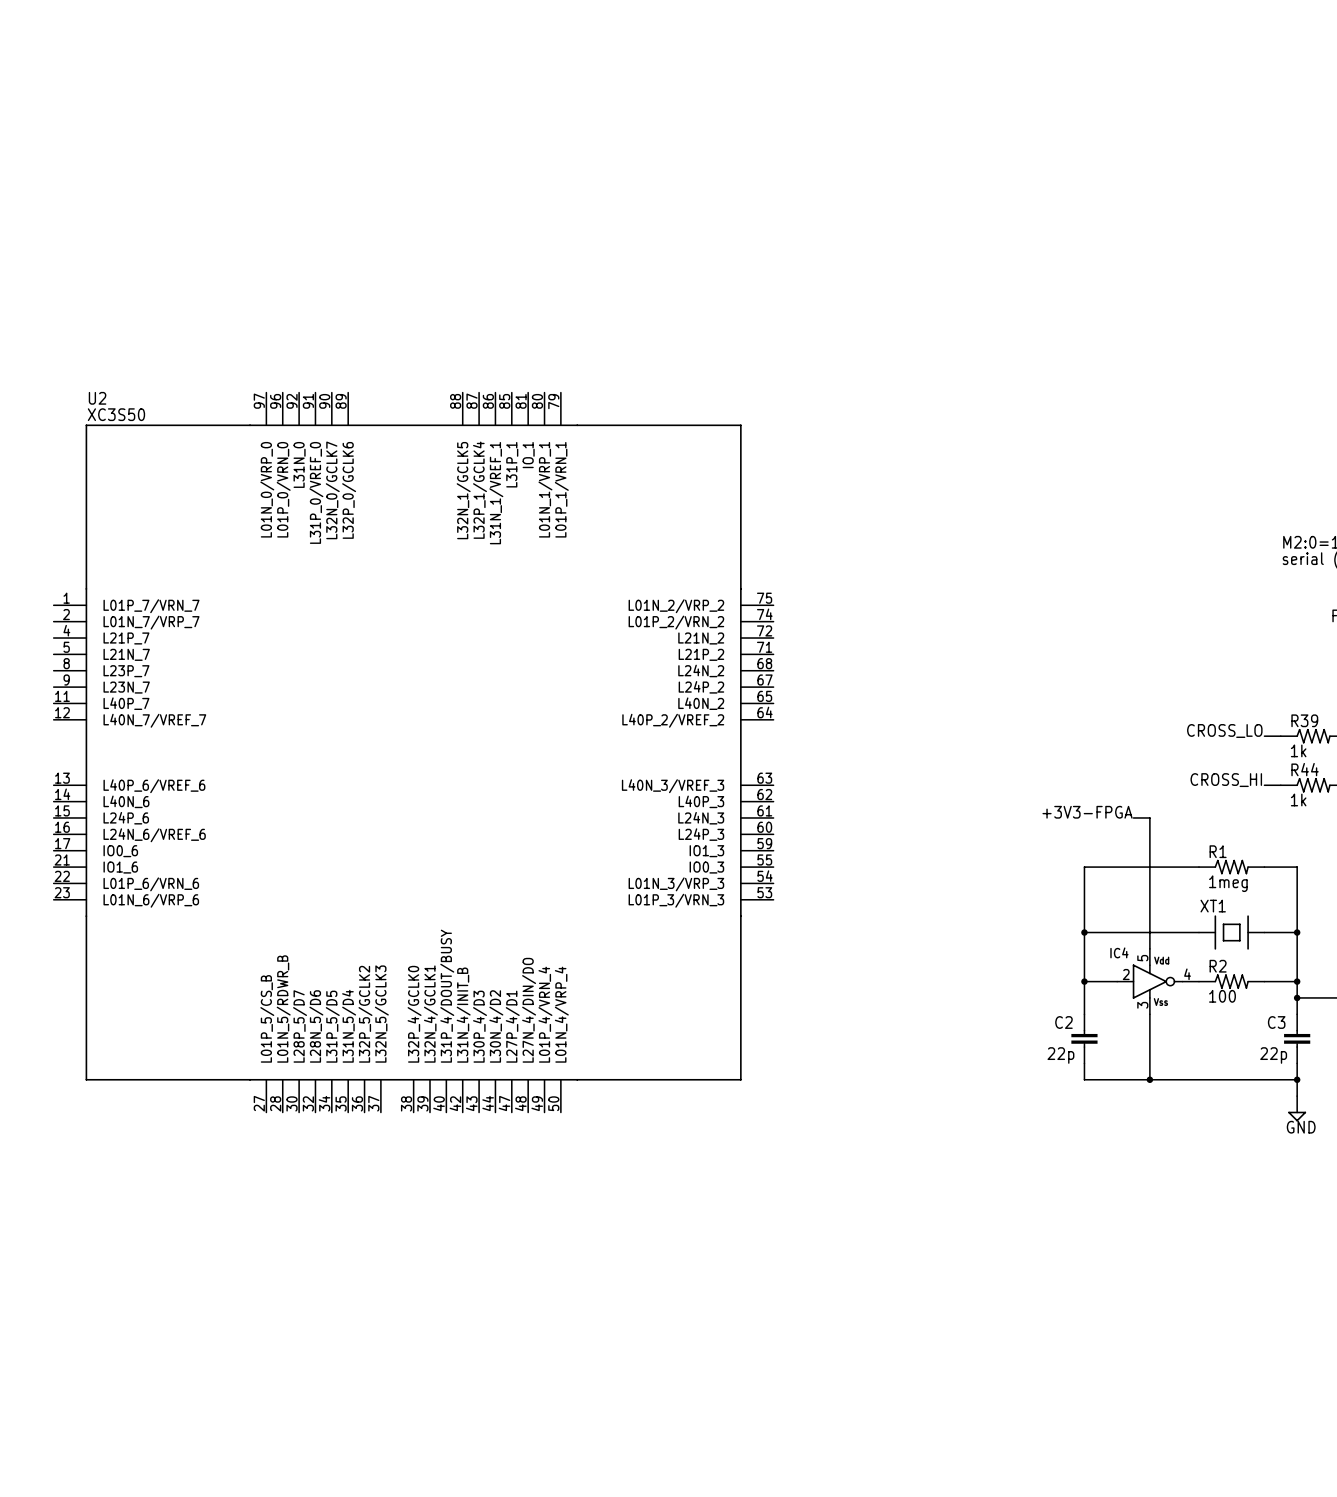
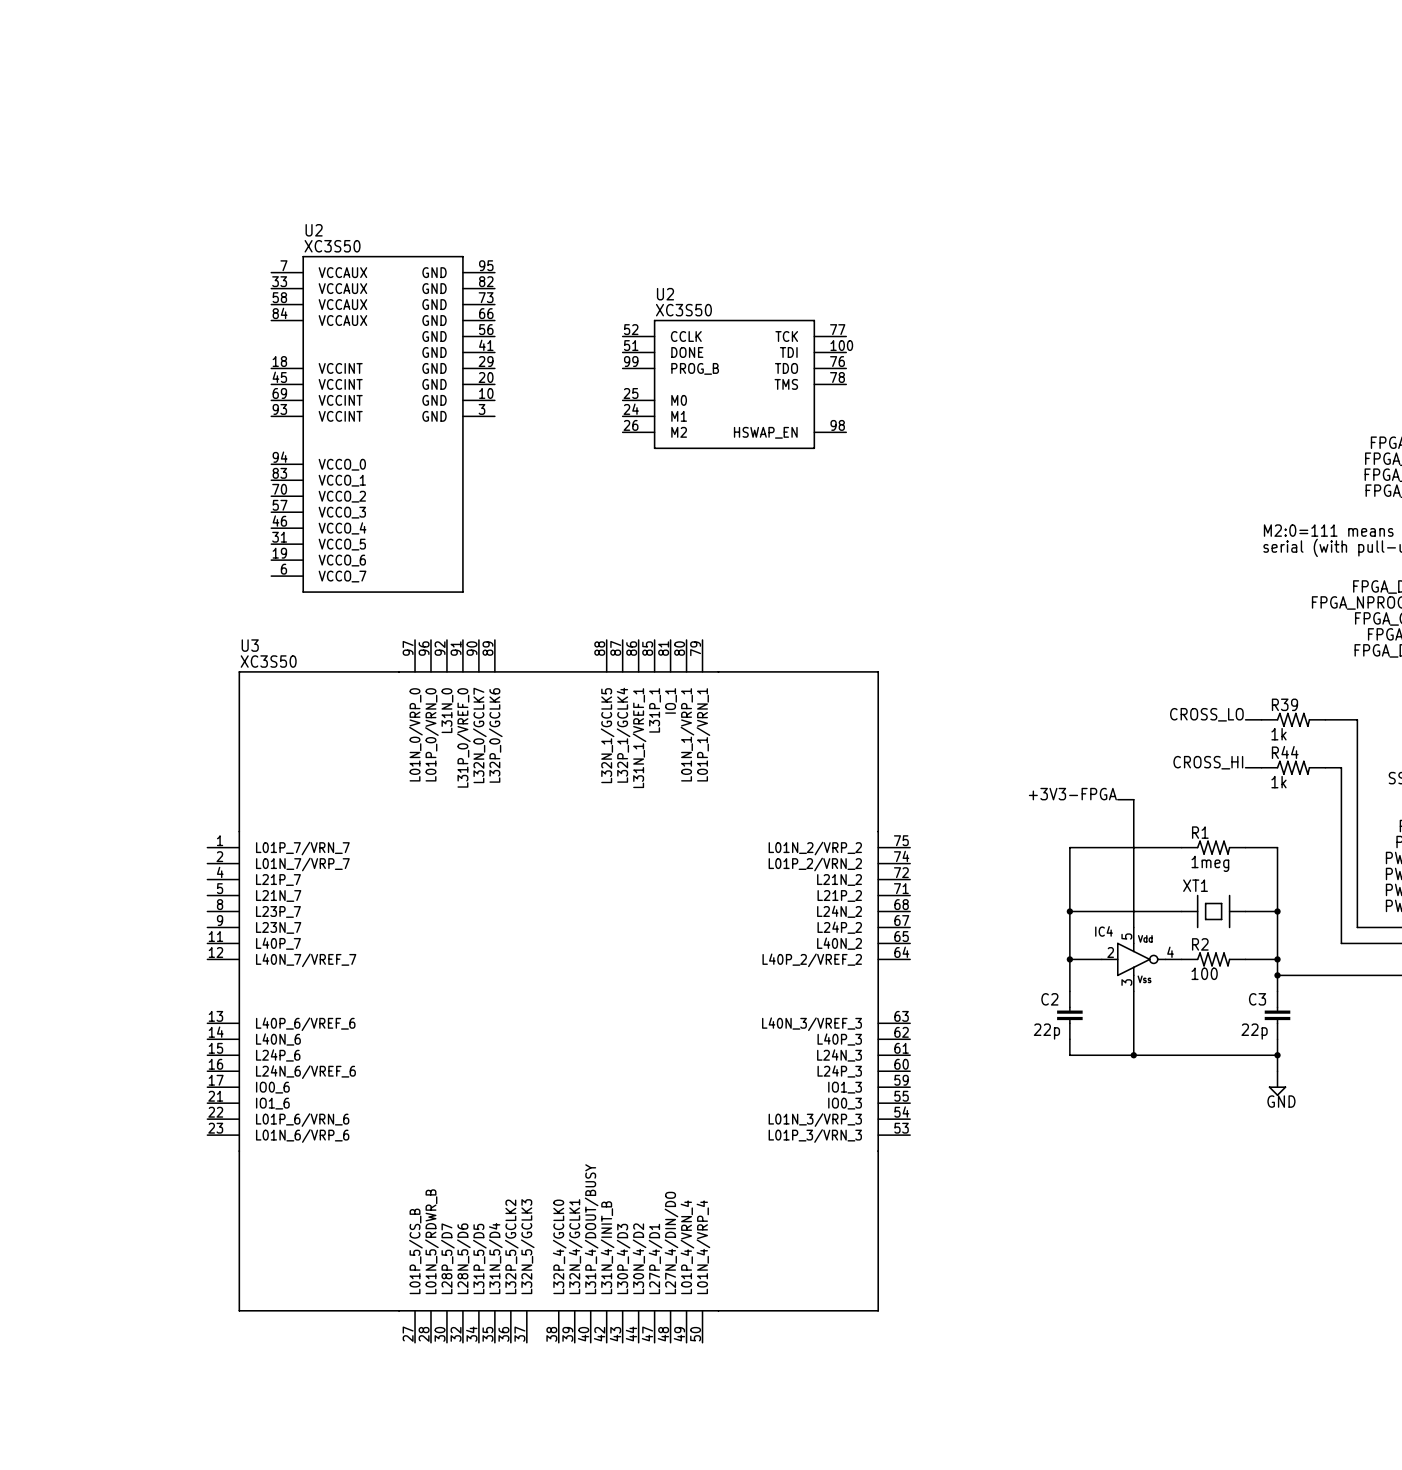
U2: none -> XC3S50 (734, 384)
U2: none -> XC3S50 (383, 424)
U2: XC3S50 (413, 752) -> none
U3: none -> XC3S50 (558, 991)

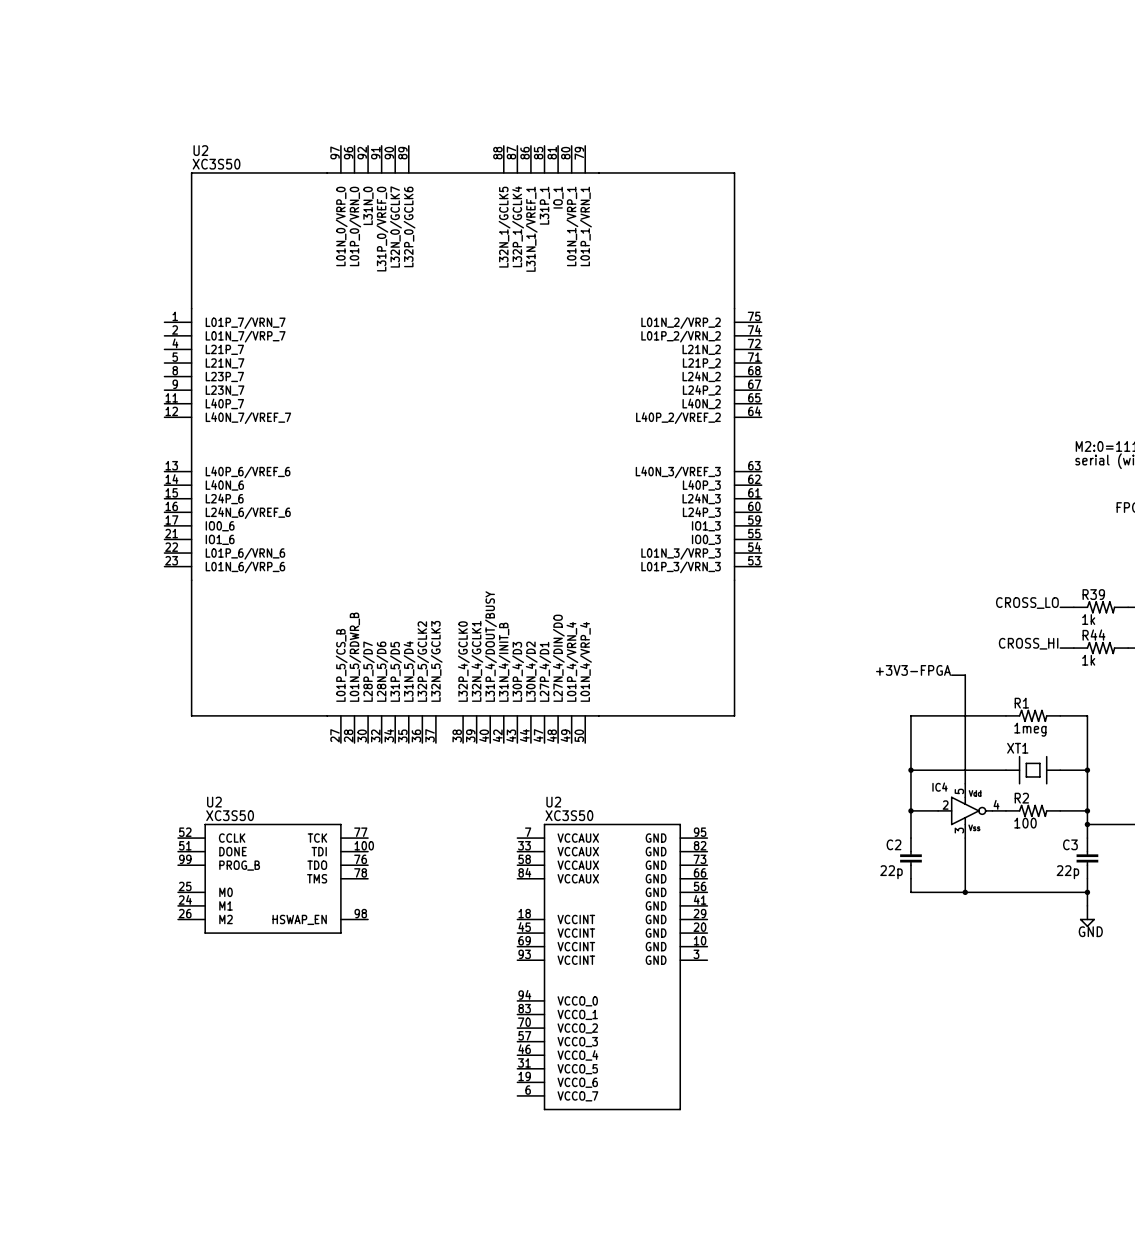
U2: XC3S50 (734, 384) -> none
U2: XC3S50 (383, 424) -> none
U2: none -> XC3S50 (463, 444)
U3: XC3S50 (558, 991) -> none
U2: none -> XC3S50 (273, 878)
U2: none -> XC3S50 (612, 967)

